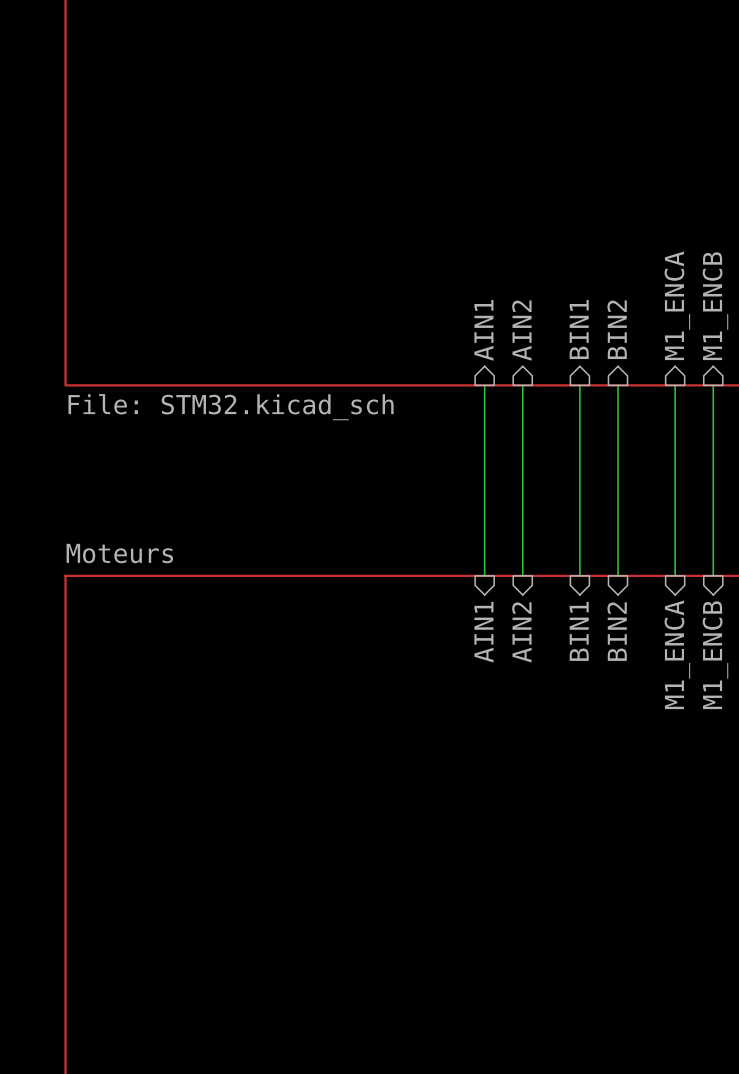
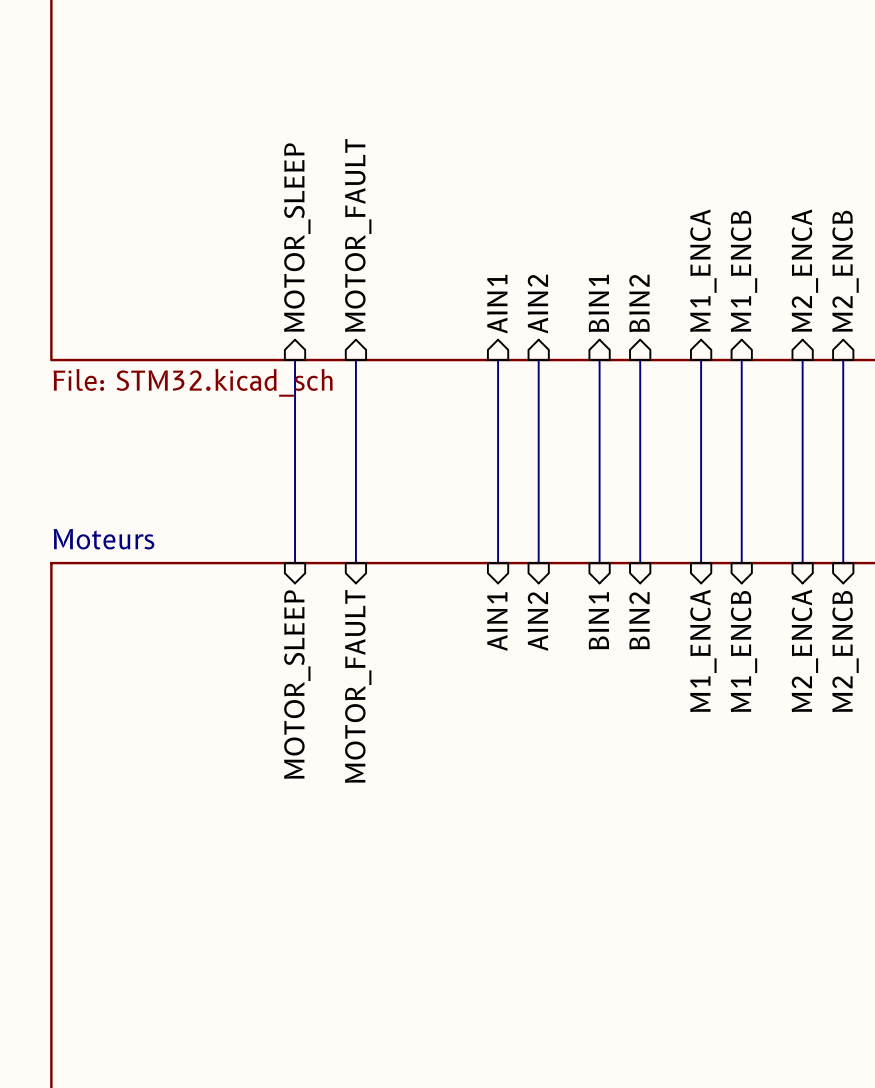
sheet pin: none -> MOTOR_SLEEP (297, 237)
sheet pin: none -> MOTOR_FAULT (358, 235)
wire: none -> (295, 360) (295, 563)
wire: none -> (355, 360) (355, 563)
sheet pin: none -> MOTOR_SLEEP (297, 684)
sheet pin: none -> MOTOR_FAULT (358, 686)

